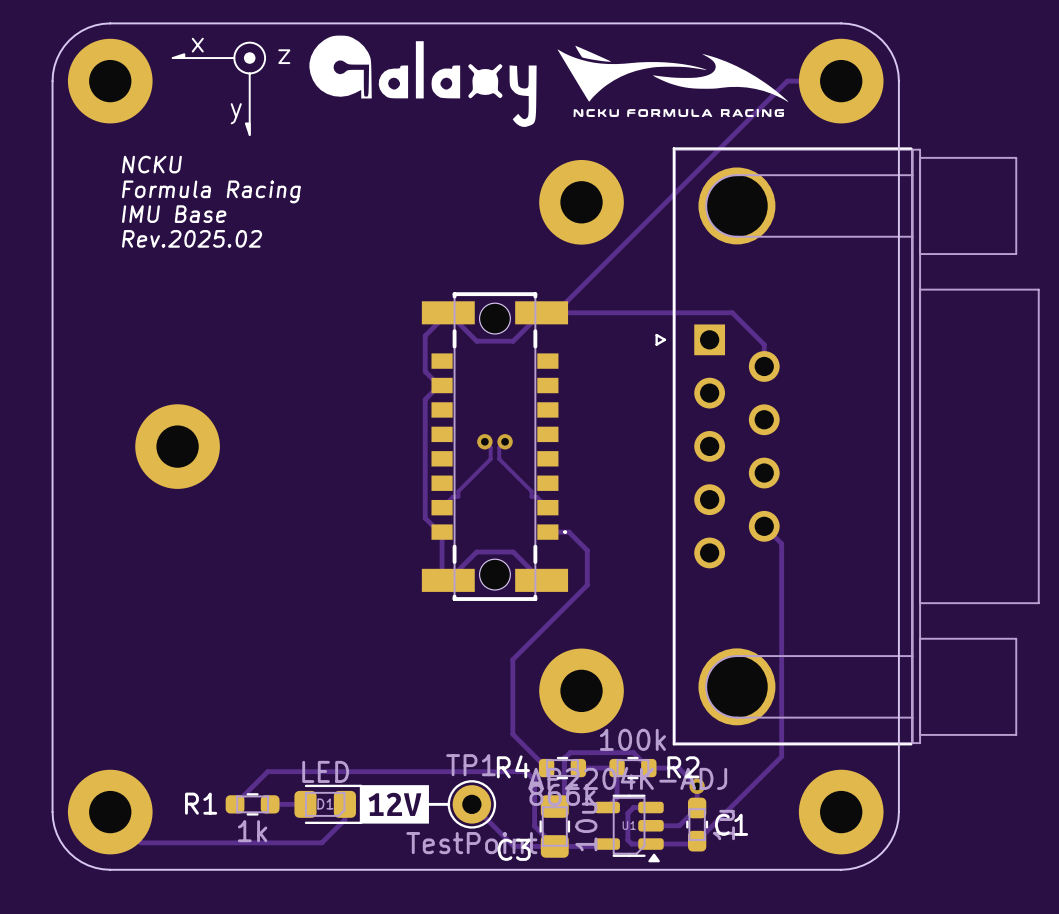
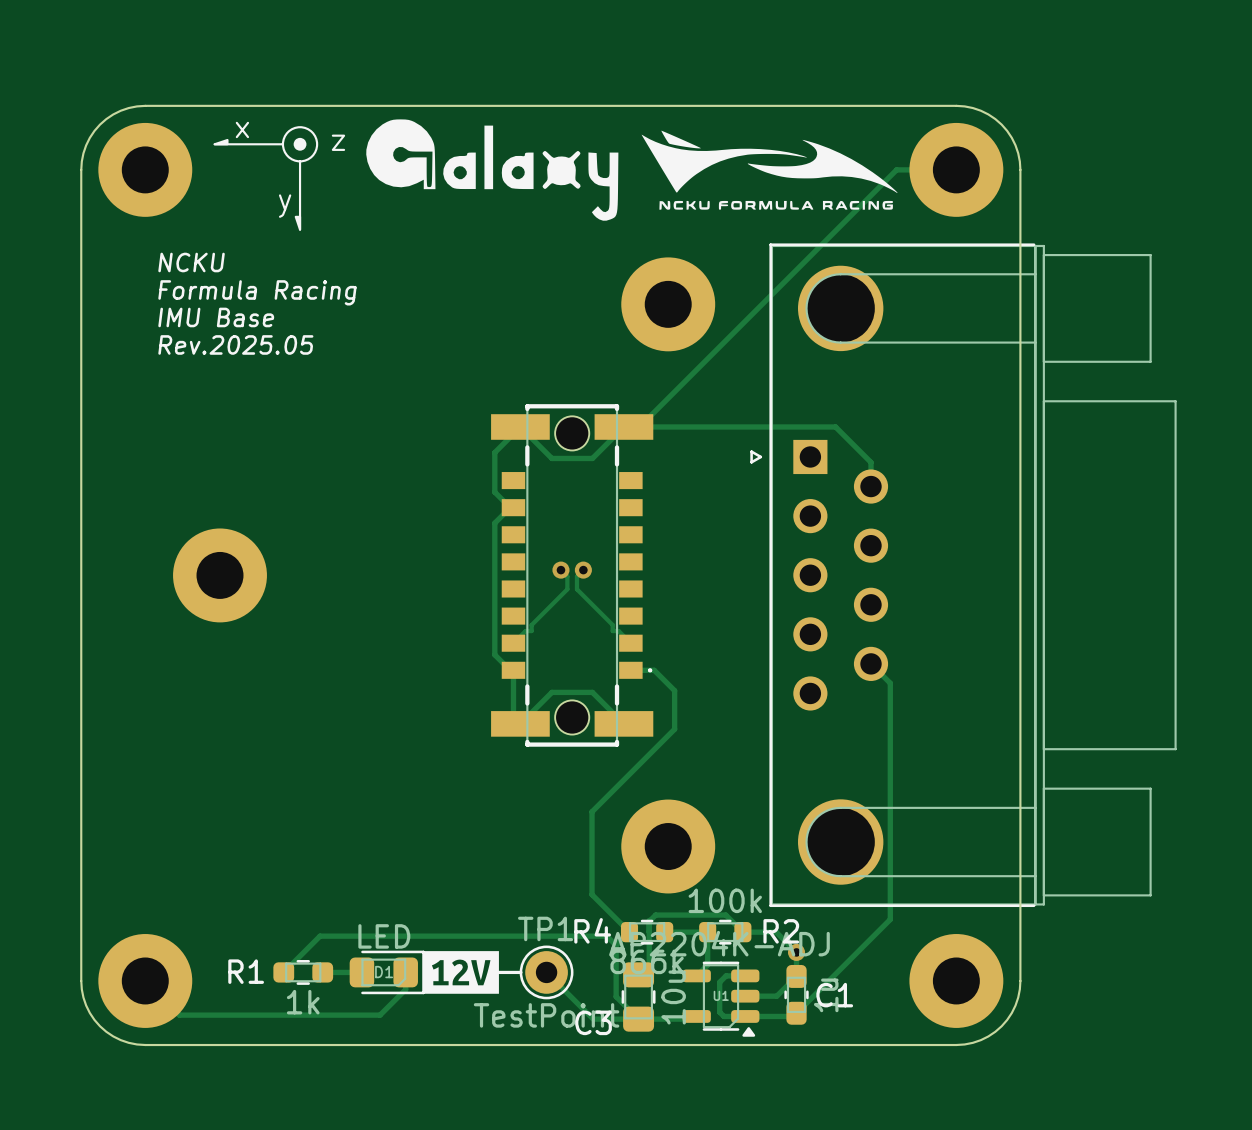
text: Rev.2025.02 (192, 238) -> Rev.2025.05 (235, 344)

